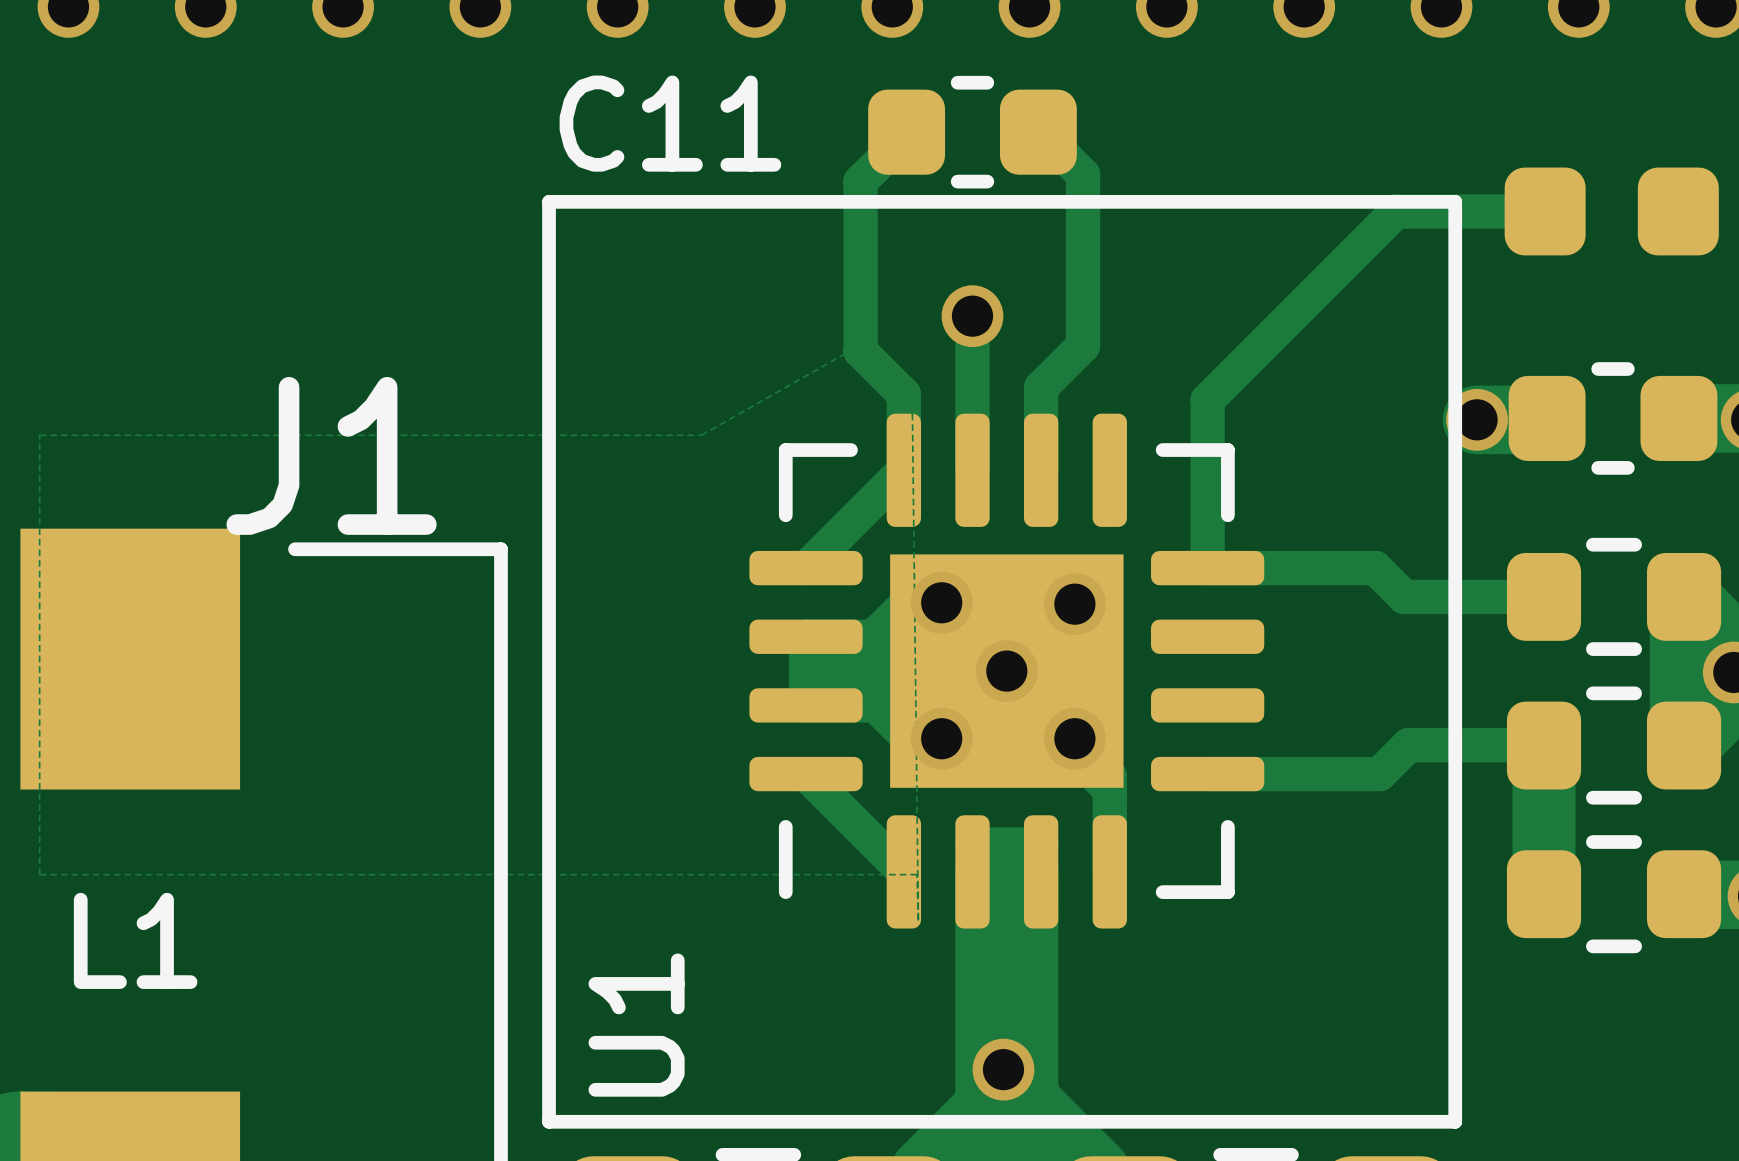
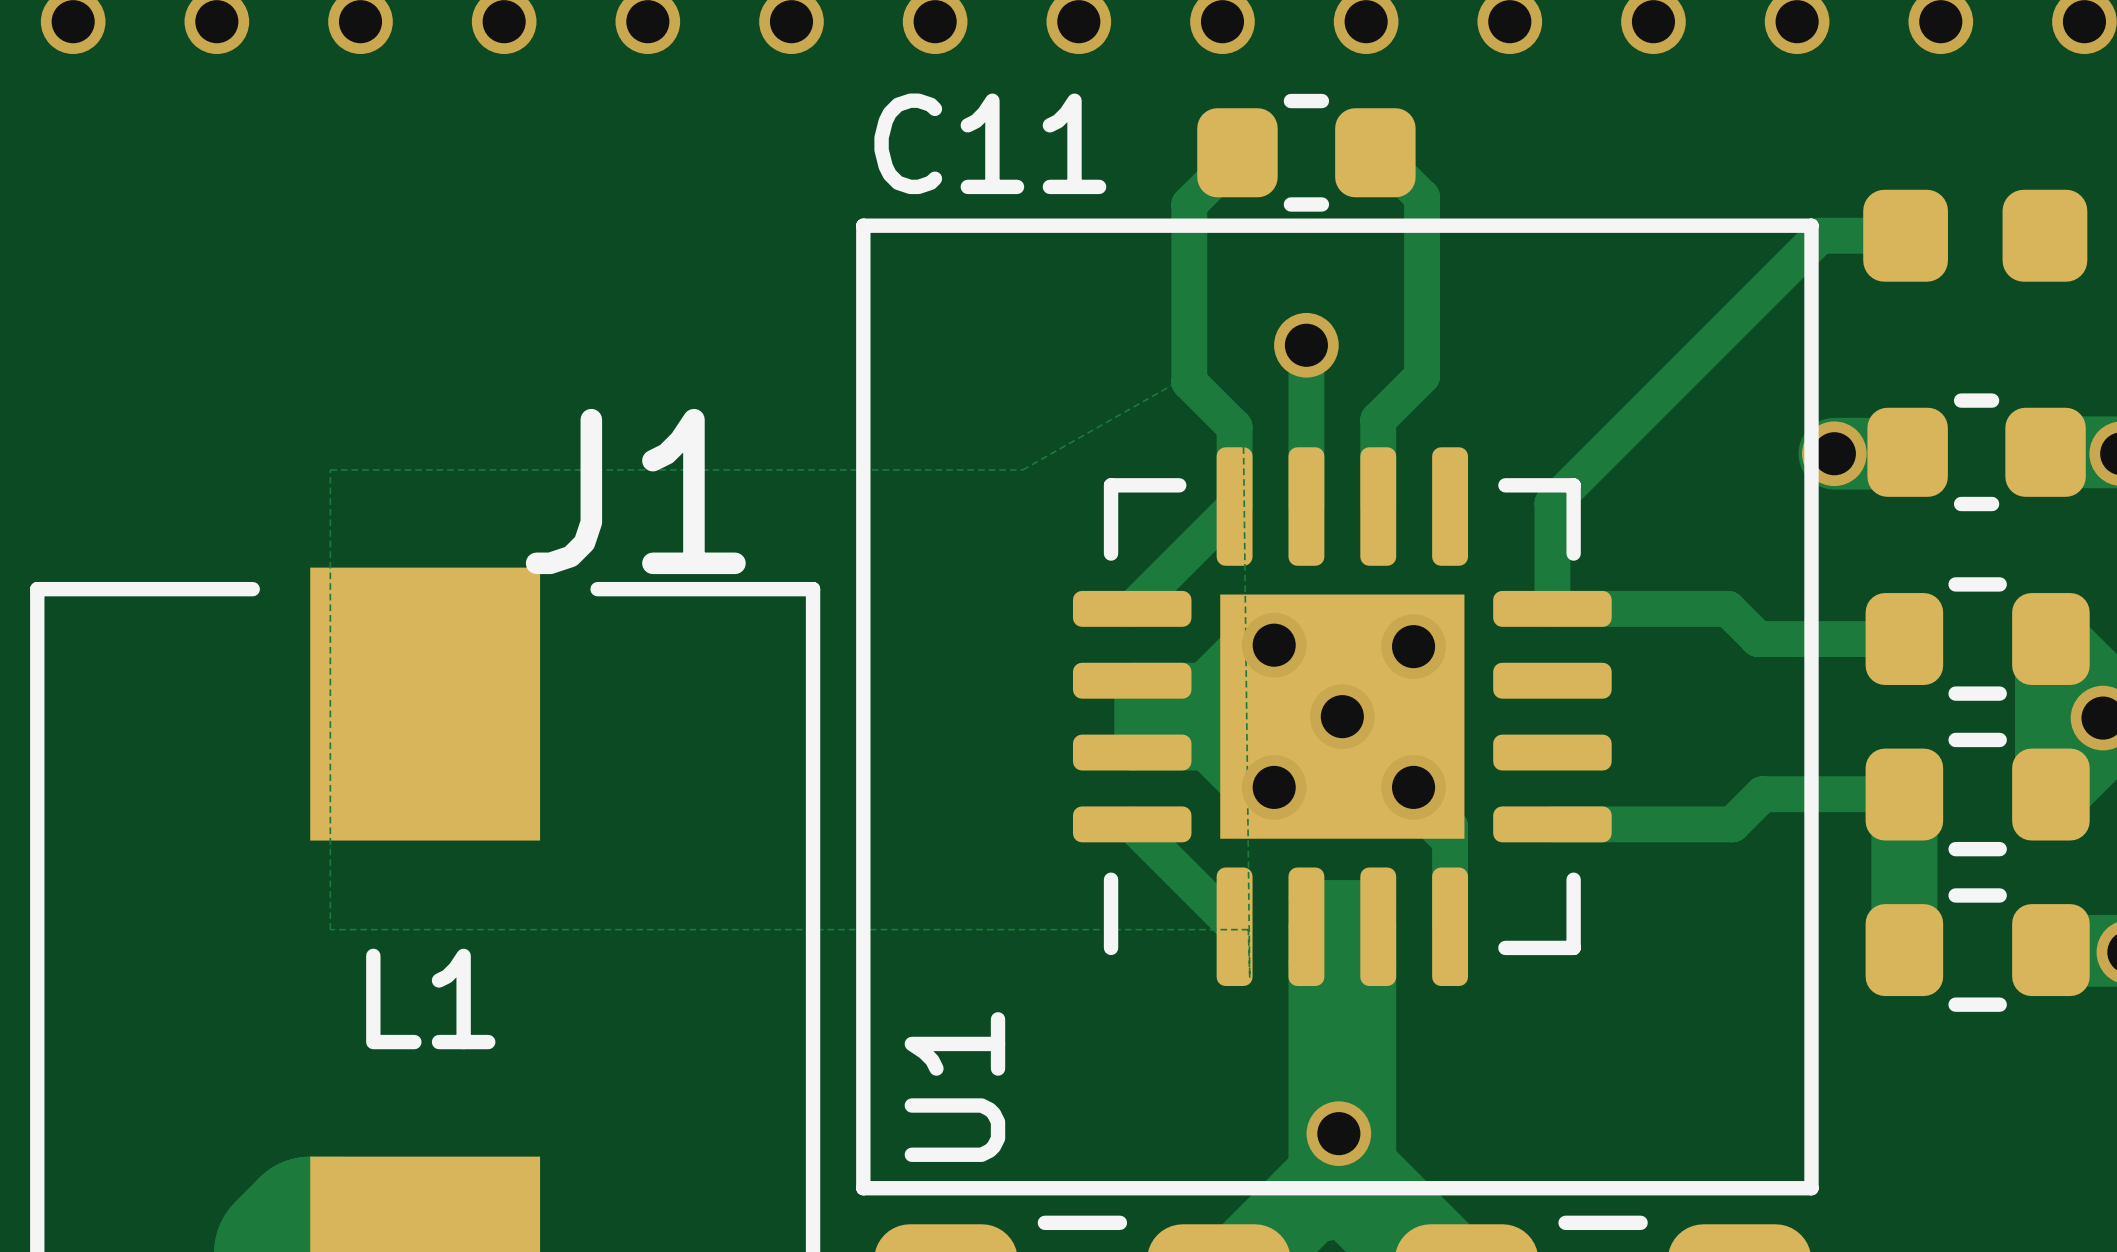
track: (1463, 211) (1396, 211) (1207, 400) (1207, 467) -> (1820, 235) (1552, 503)

